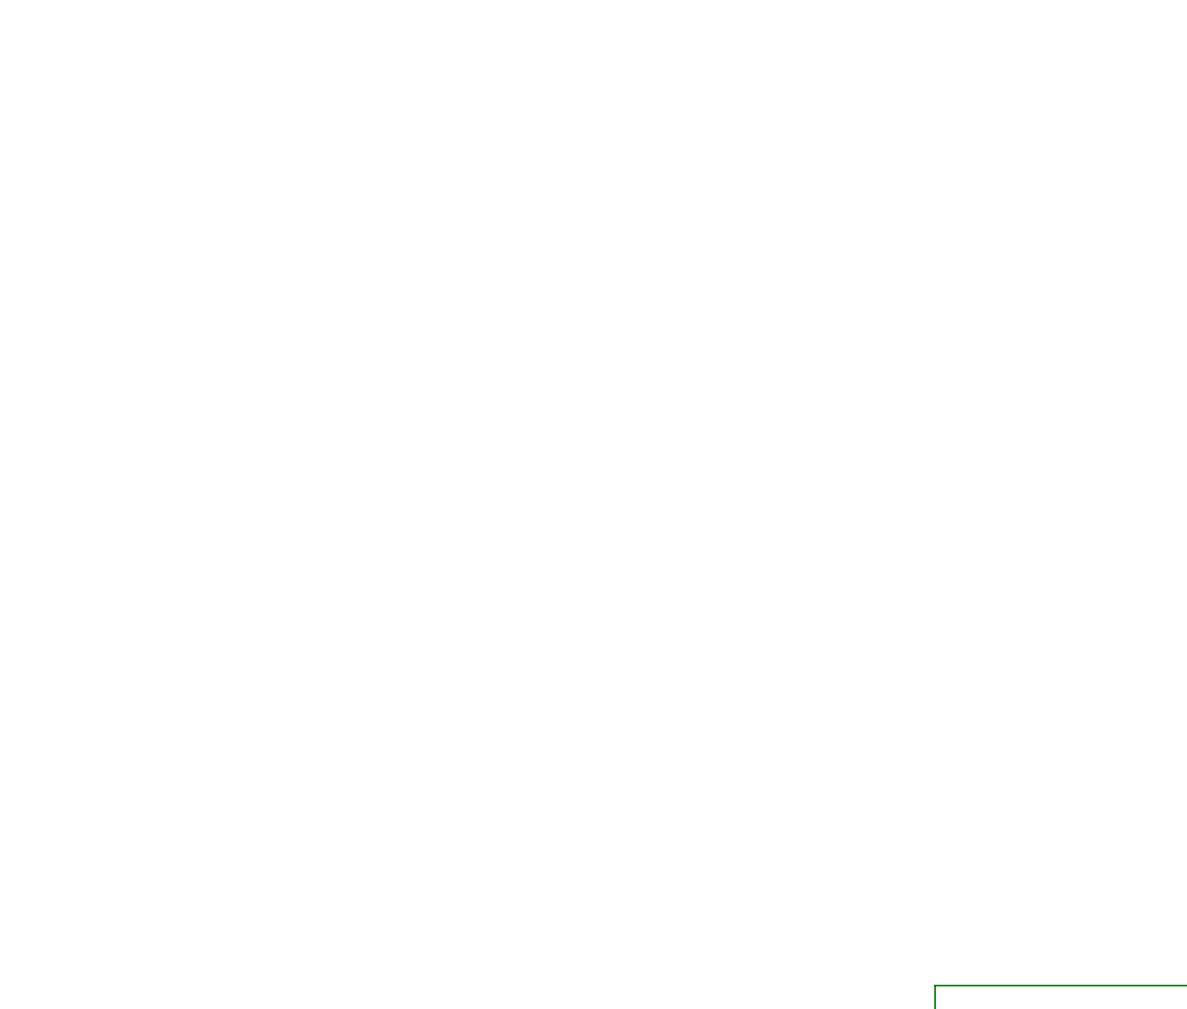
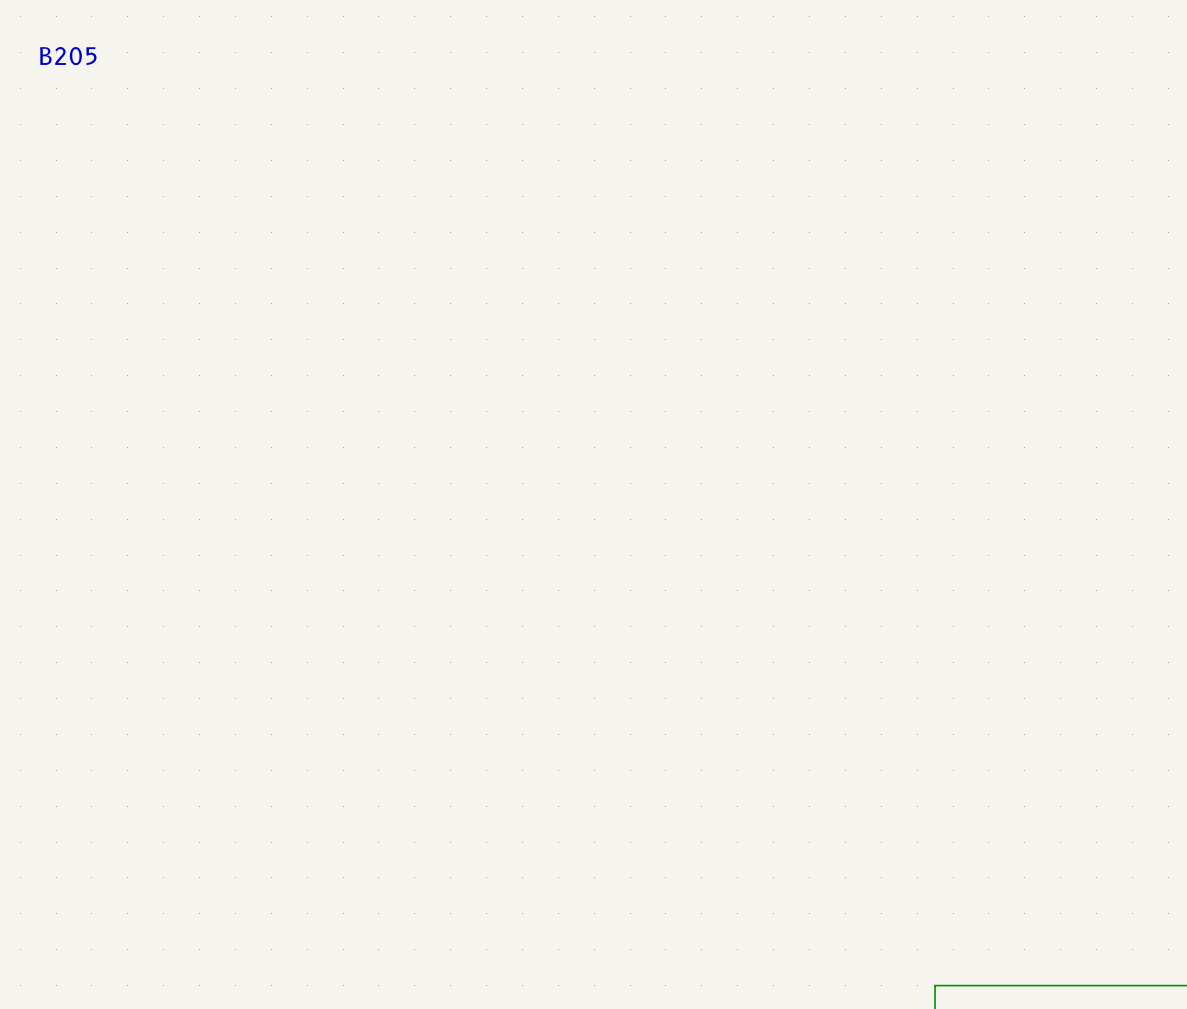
text: none -> B205 (68, 56)

